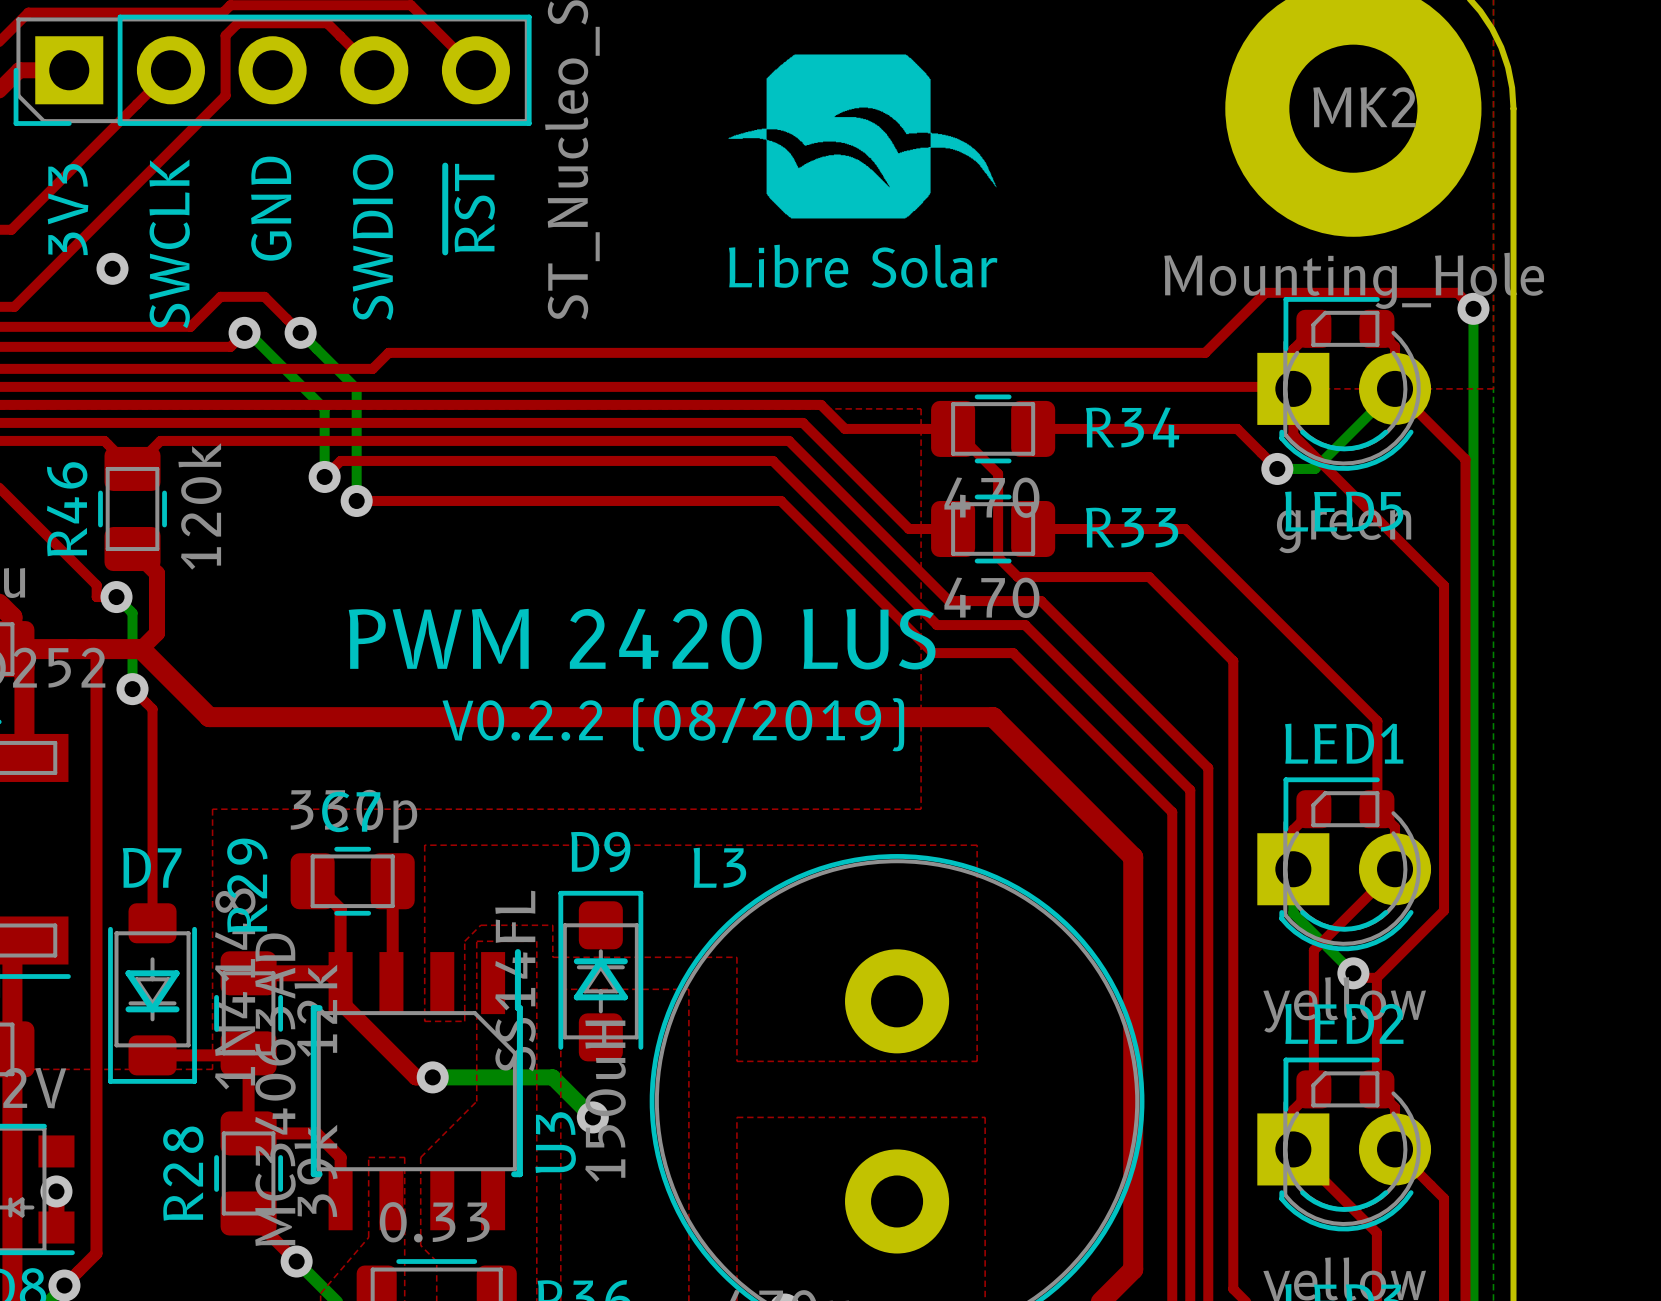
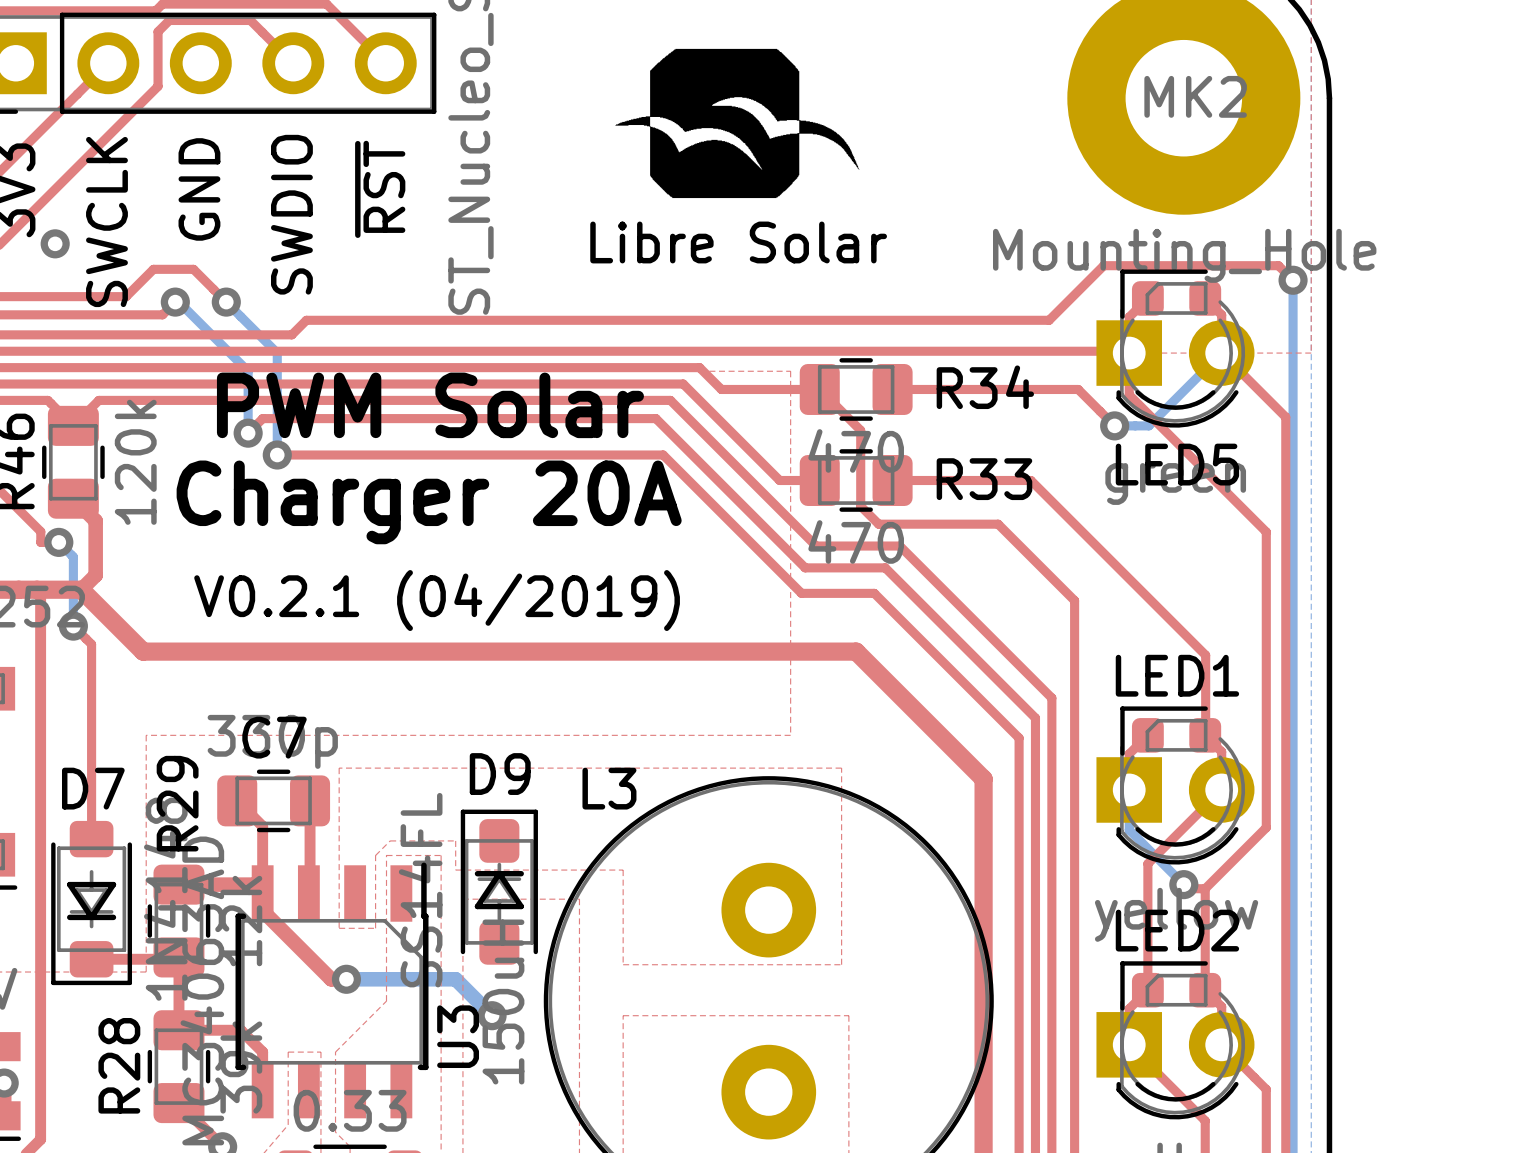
text: none -> PWM Solar (430, 405)
text: none -> Charger 20A (429, 502)
text: PWM 2420 LUS (642, 639) -> none
text: V0.2.2 (08/2019) (673, 724) -> V0.2.1 (04/2019) (437, 600)

